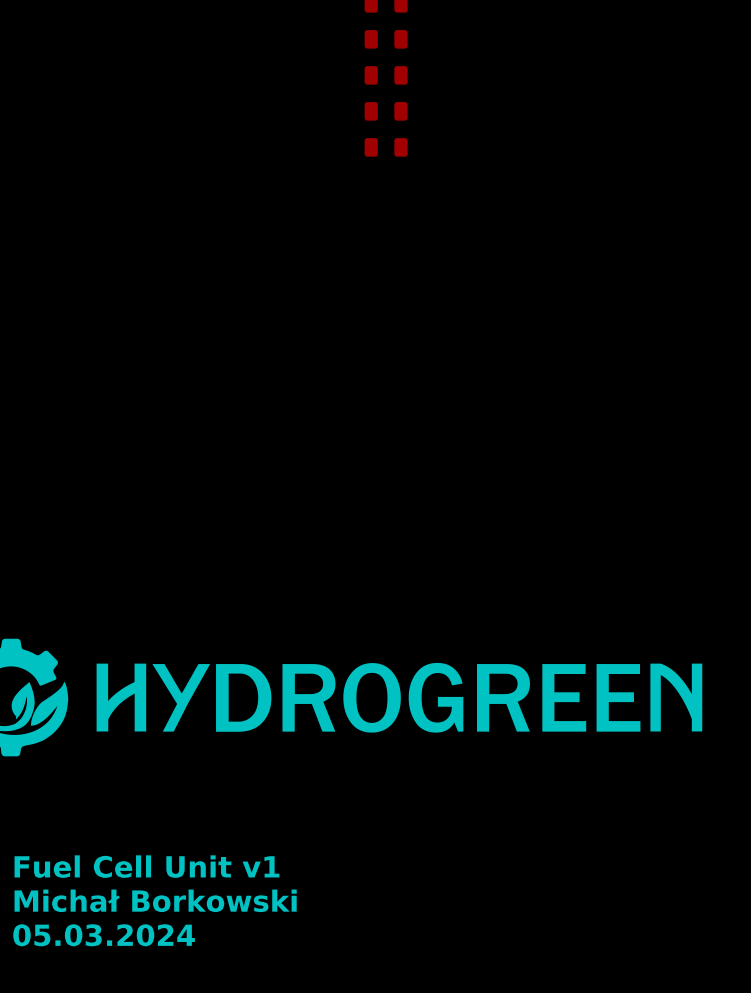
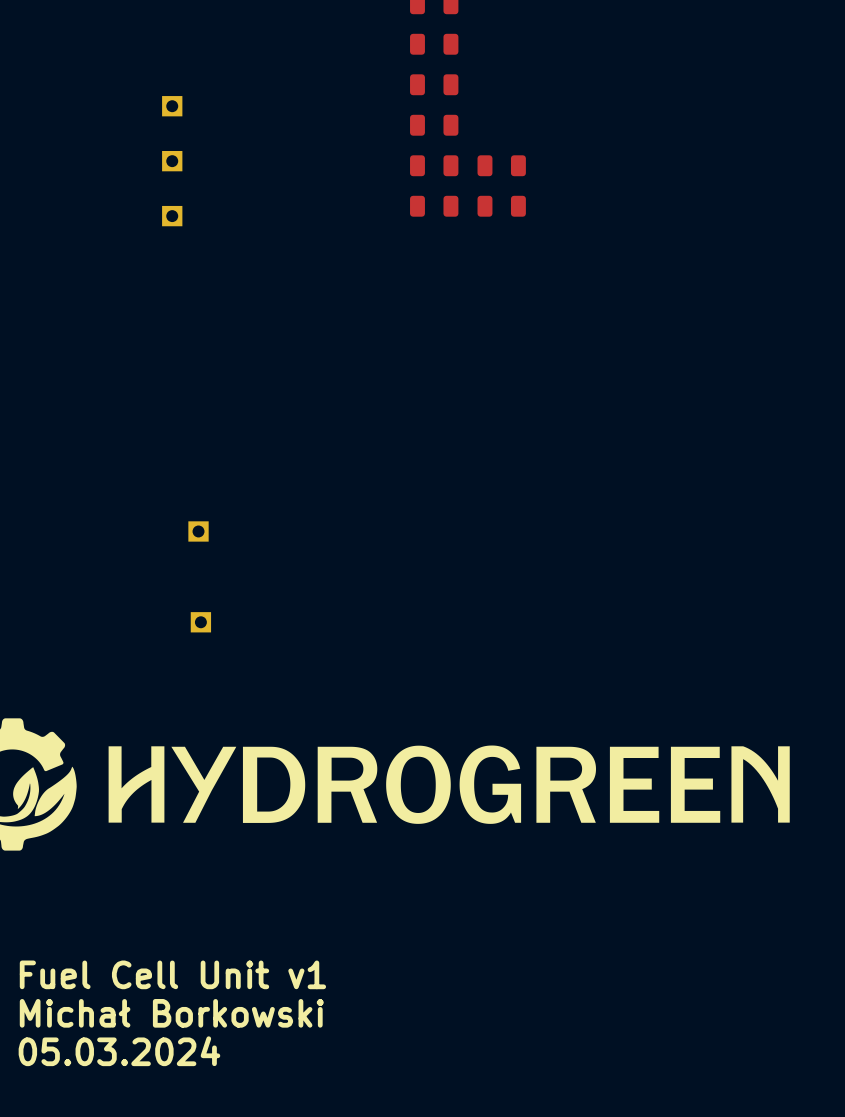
part: none -> (172, 106)
part: none -> (172, 161)
part: none -> (501, 165)
part: none -> (434, 206)
part: none -> (501, 206)
part: none -> (172, 216)
part: none -> (198, 531)
part: none -> (200, 622)

